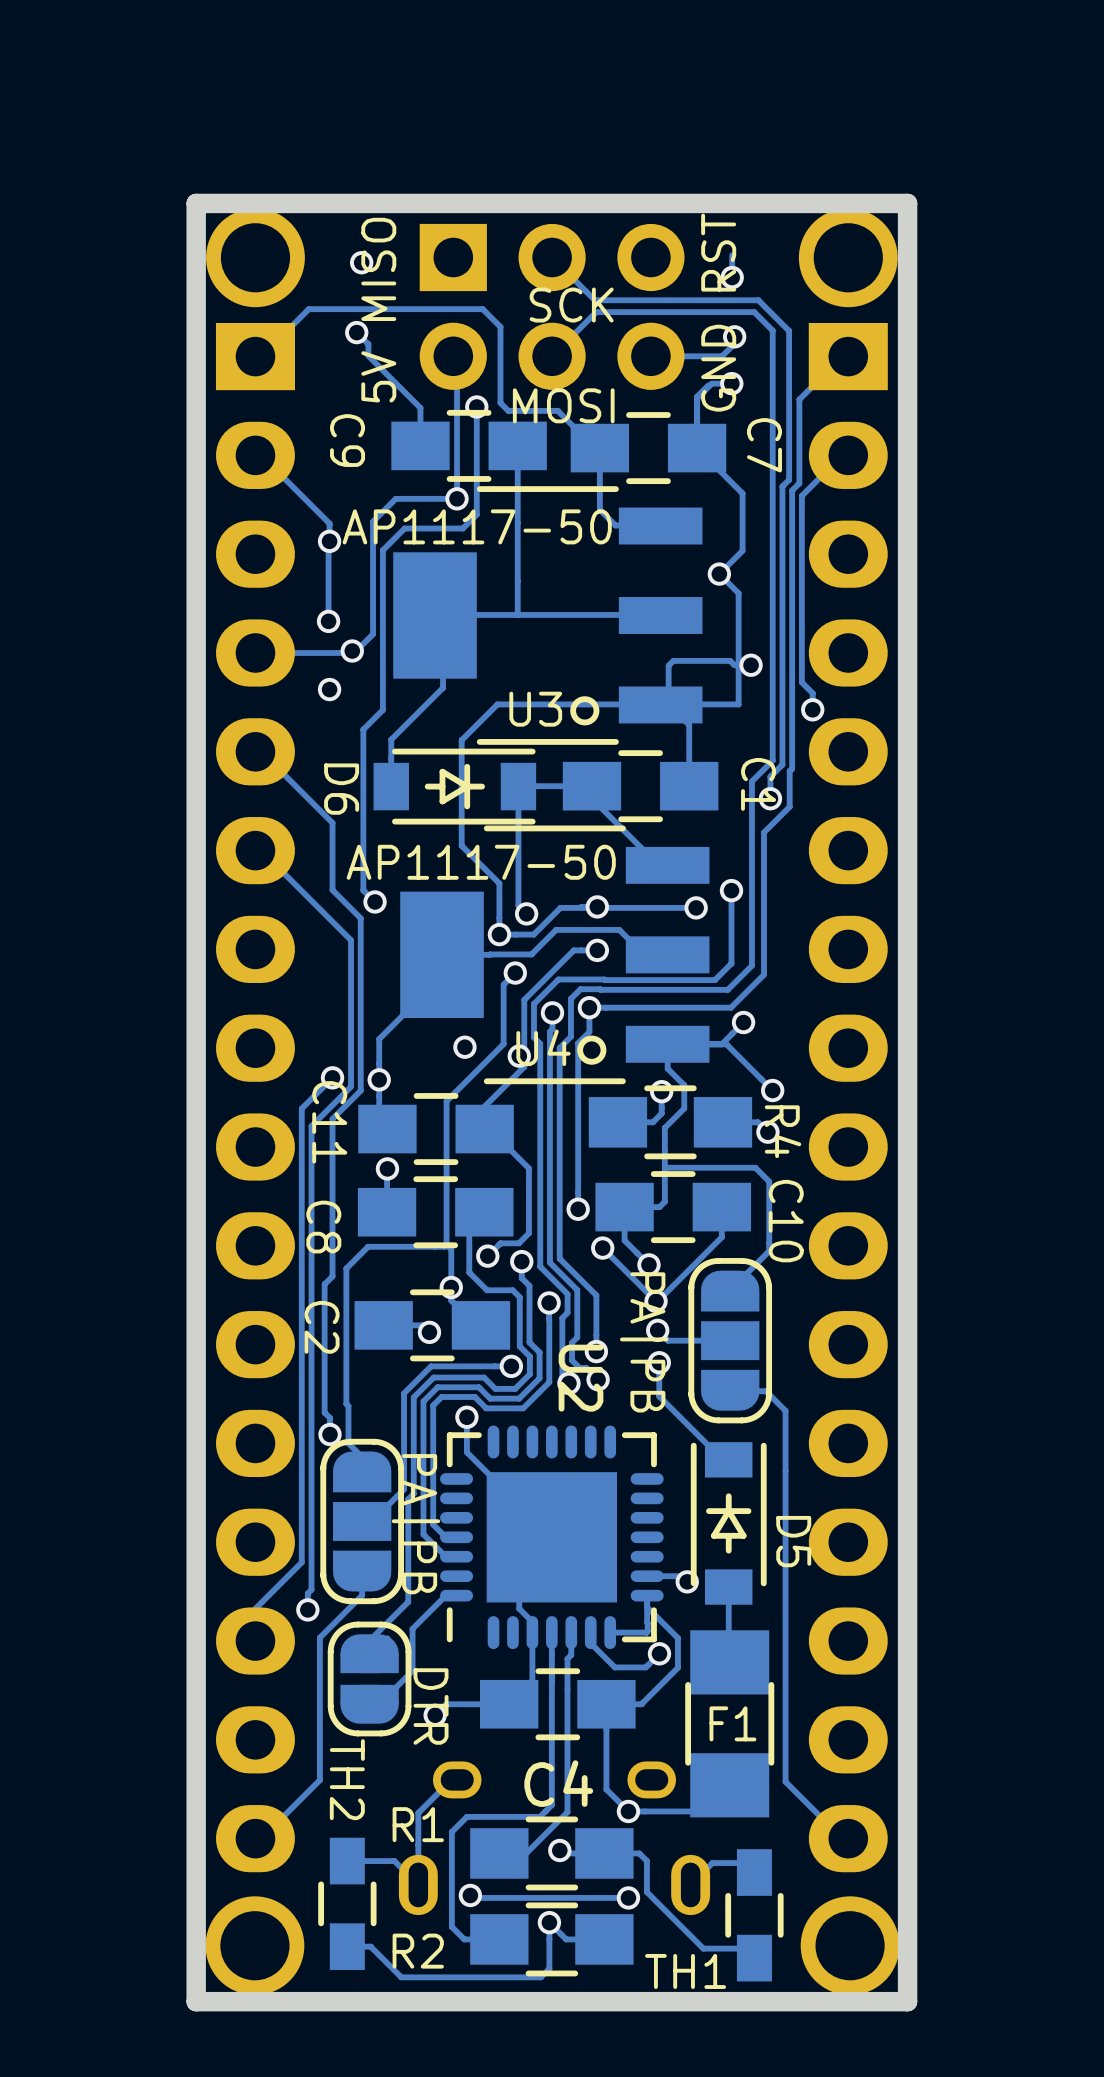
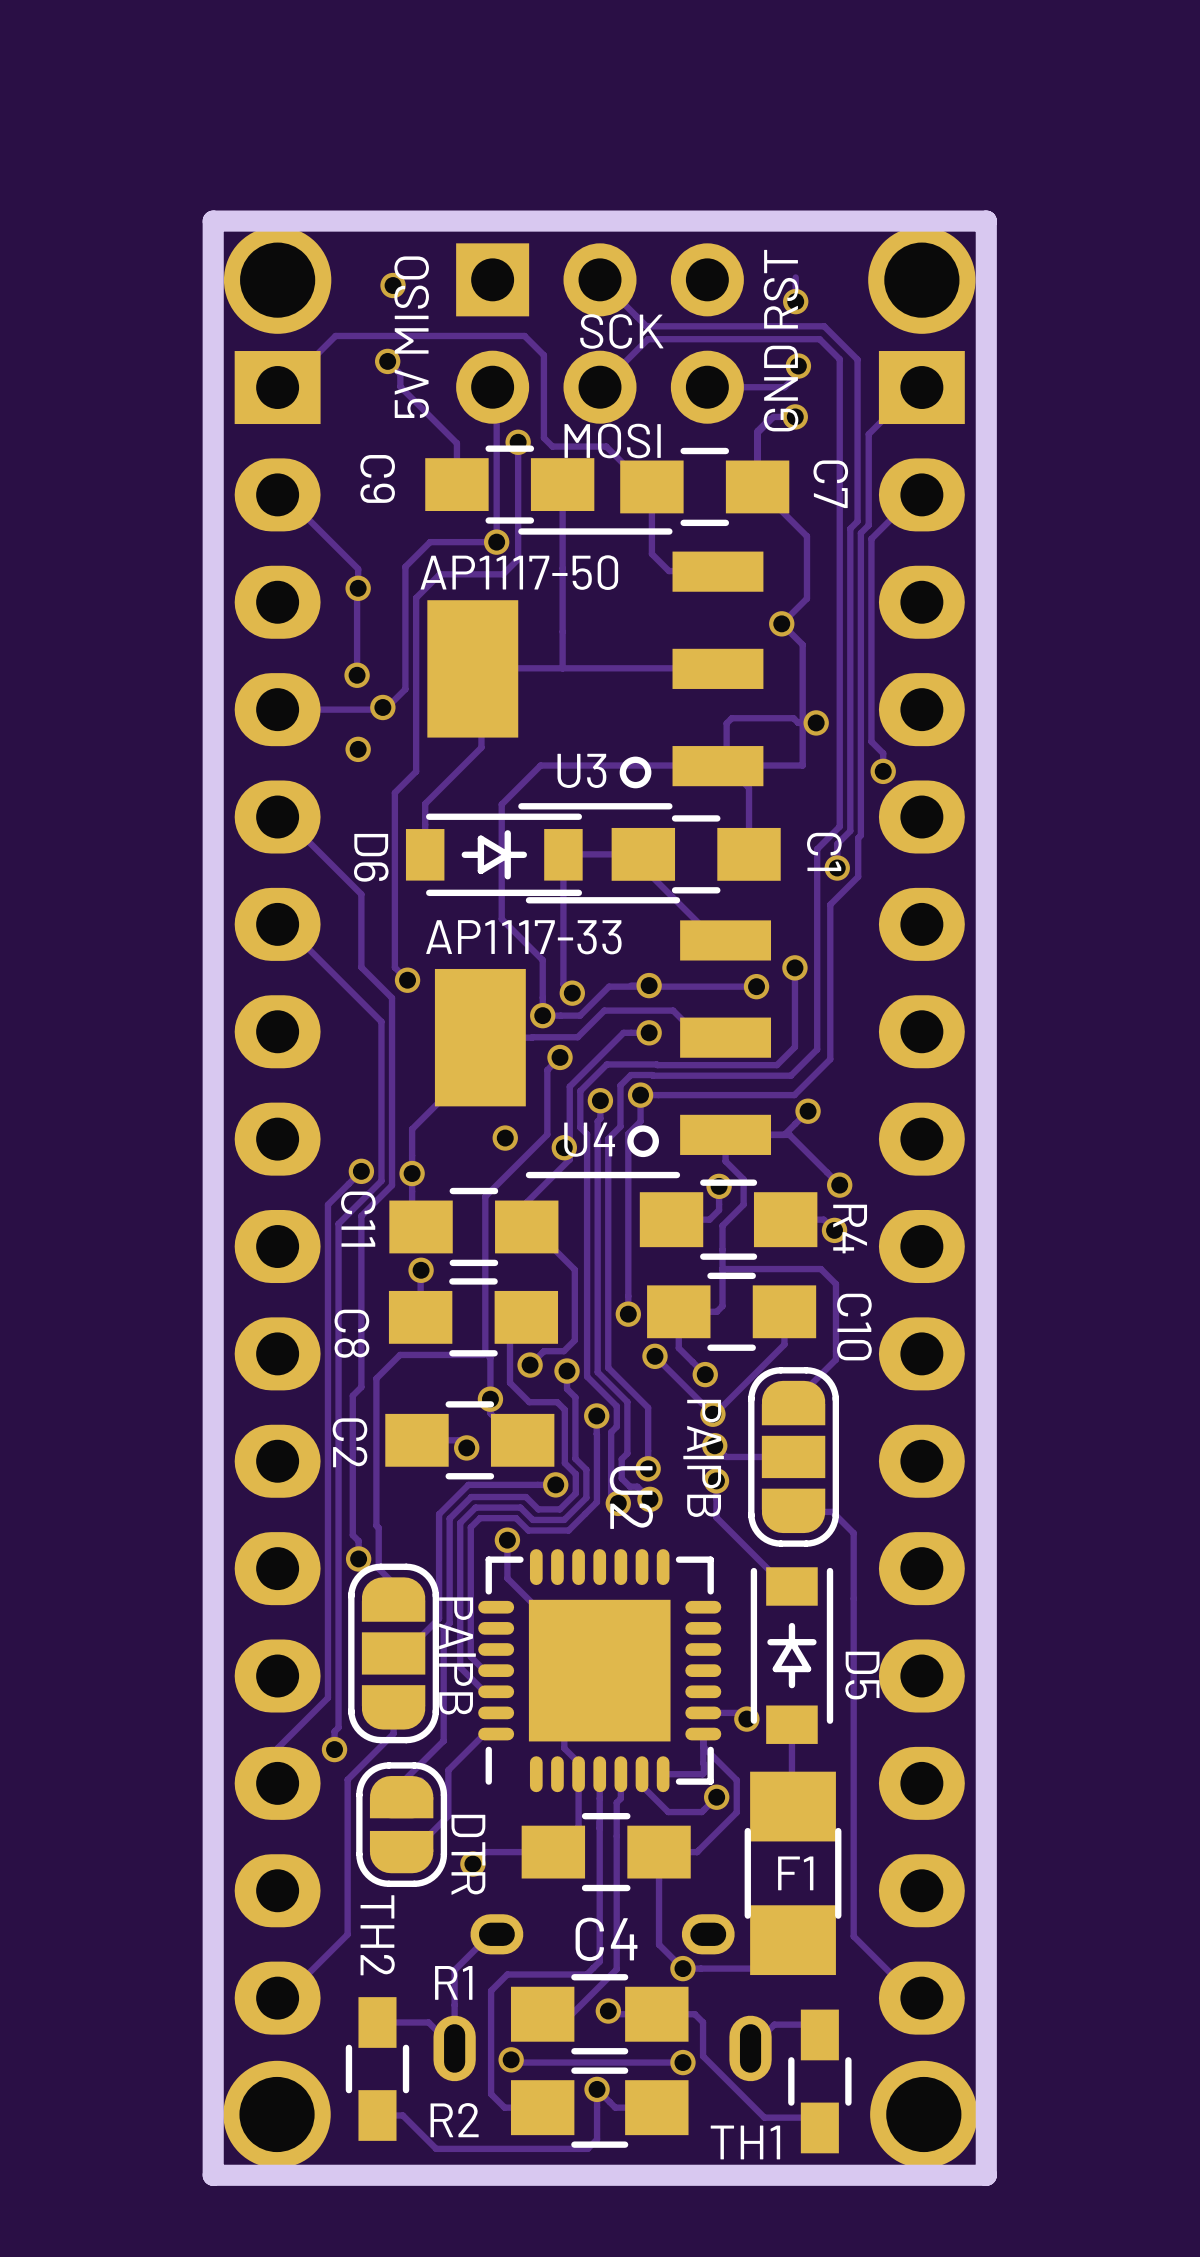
U4 value: AP1117-50 (481, 862) -> AP1117-33 (523, 937)

